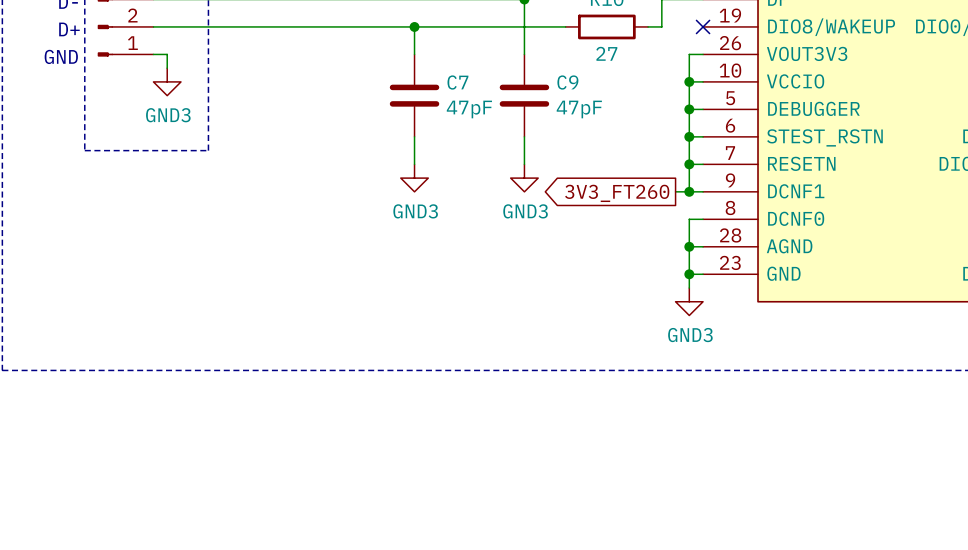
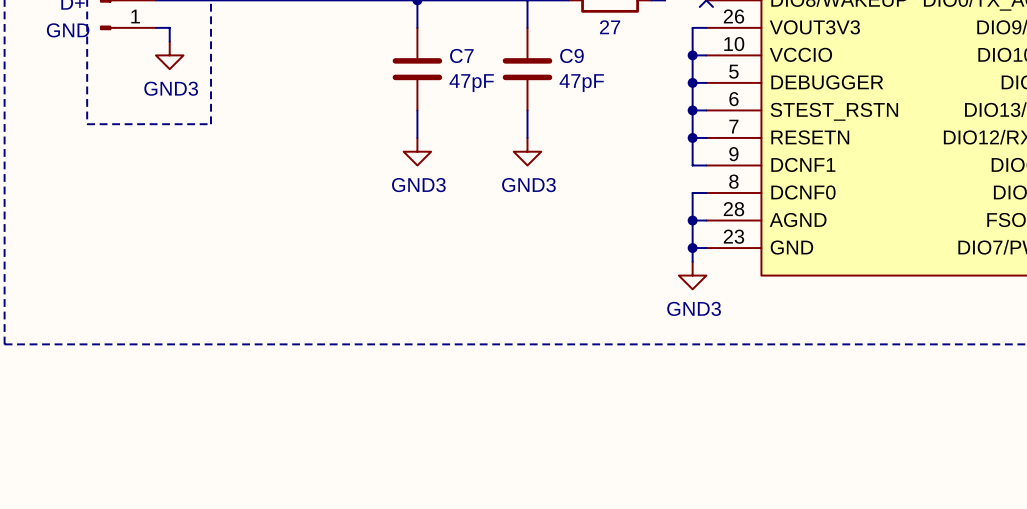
wire: (675, 191) (689, 191) -> none
junction: (689, 191) -> none
global label: 3V3_FT260 (617, 193) -> none

